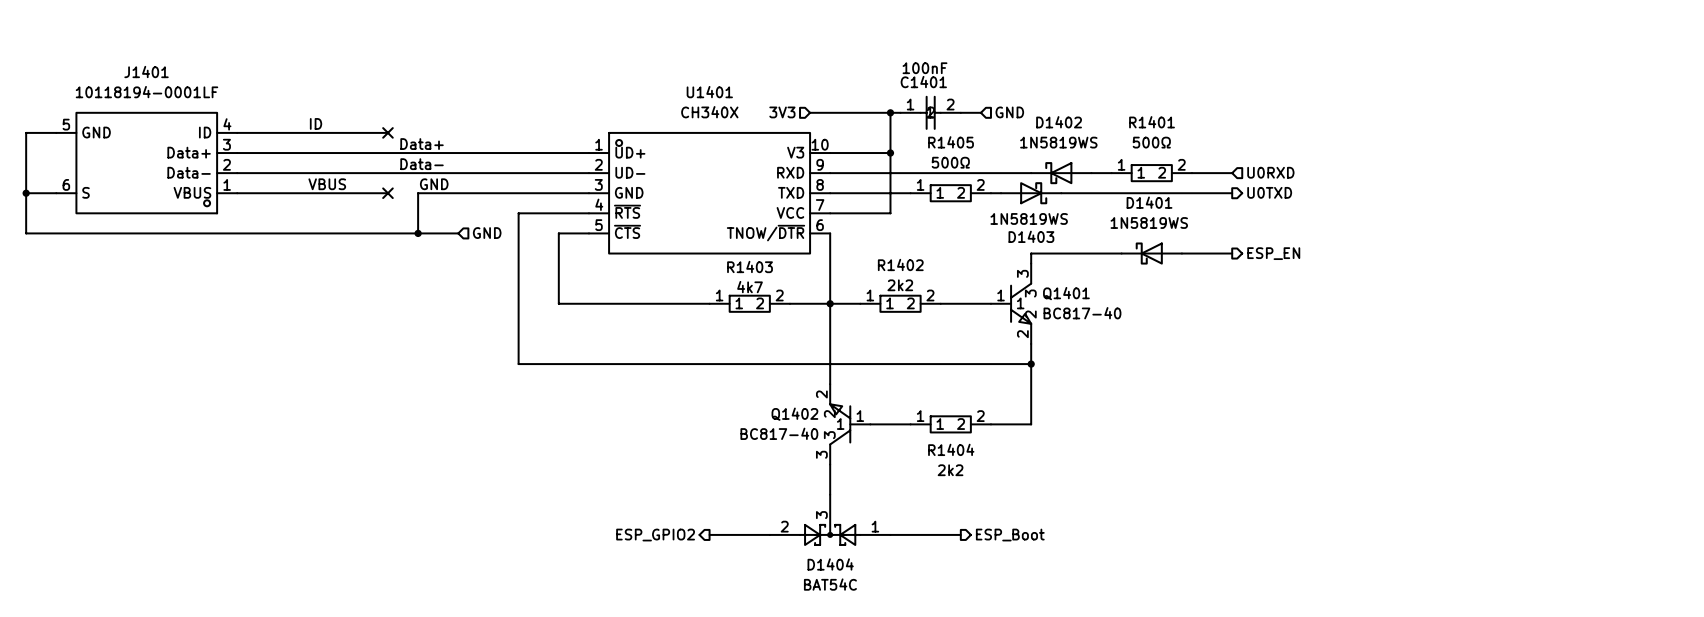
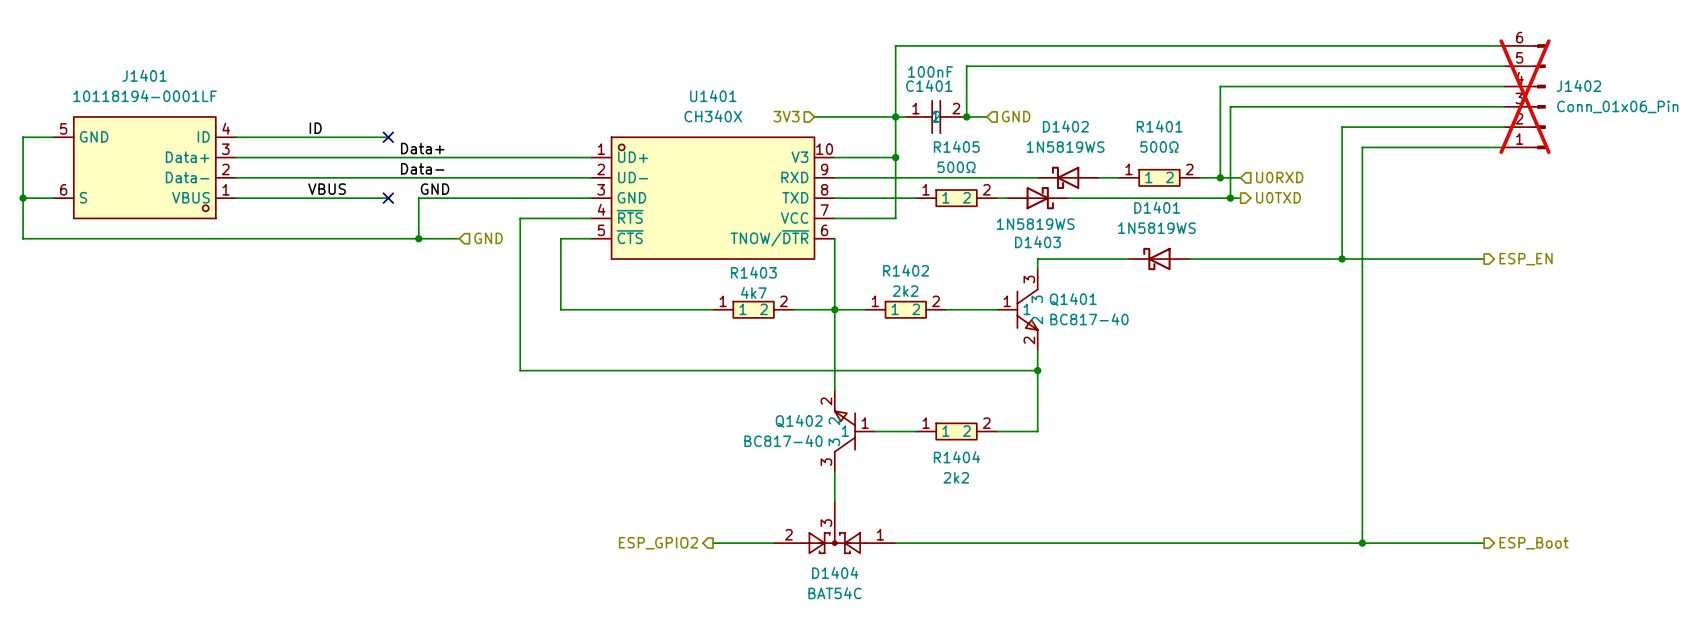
wire: none -> (1504, 45) (895, 45) (895, 116)
wire: none -> (1504, 66) (966, 66) (966, 116)
wire: none -> (1504, 86) (1220, 86) (1220, 177)
J1402: none -> Conn_01x06_Pin (1525, 96)
wire: none -> (1504, 106) (1230, 106) (1230, 198)
junction: none -> (966, 116)
wire: none -> (1504, 127) (1342, 127) (1342, 259)
wire: none -> (1504, 147) (1362, 147) (1362, 543)
junction: none -> (1220, 177)
junction: none -> (1230, 198)
wire: none -> (1240, 259) (1484, 259)
hierarchical label: ESP_EN (1273, 253) -> none
junction: none -> (1342, 259)
hierarchical label: none -> ESP_EN (1526, 259)
wire: none -> (966, 543) (1484, 543)
junction: none -> (1362, 543)
hierarchical label: ESP_Boot (1010, 535) -> none
hierarchical label: none -> ESP_Boot (1534, 543)

